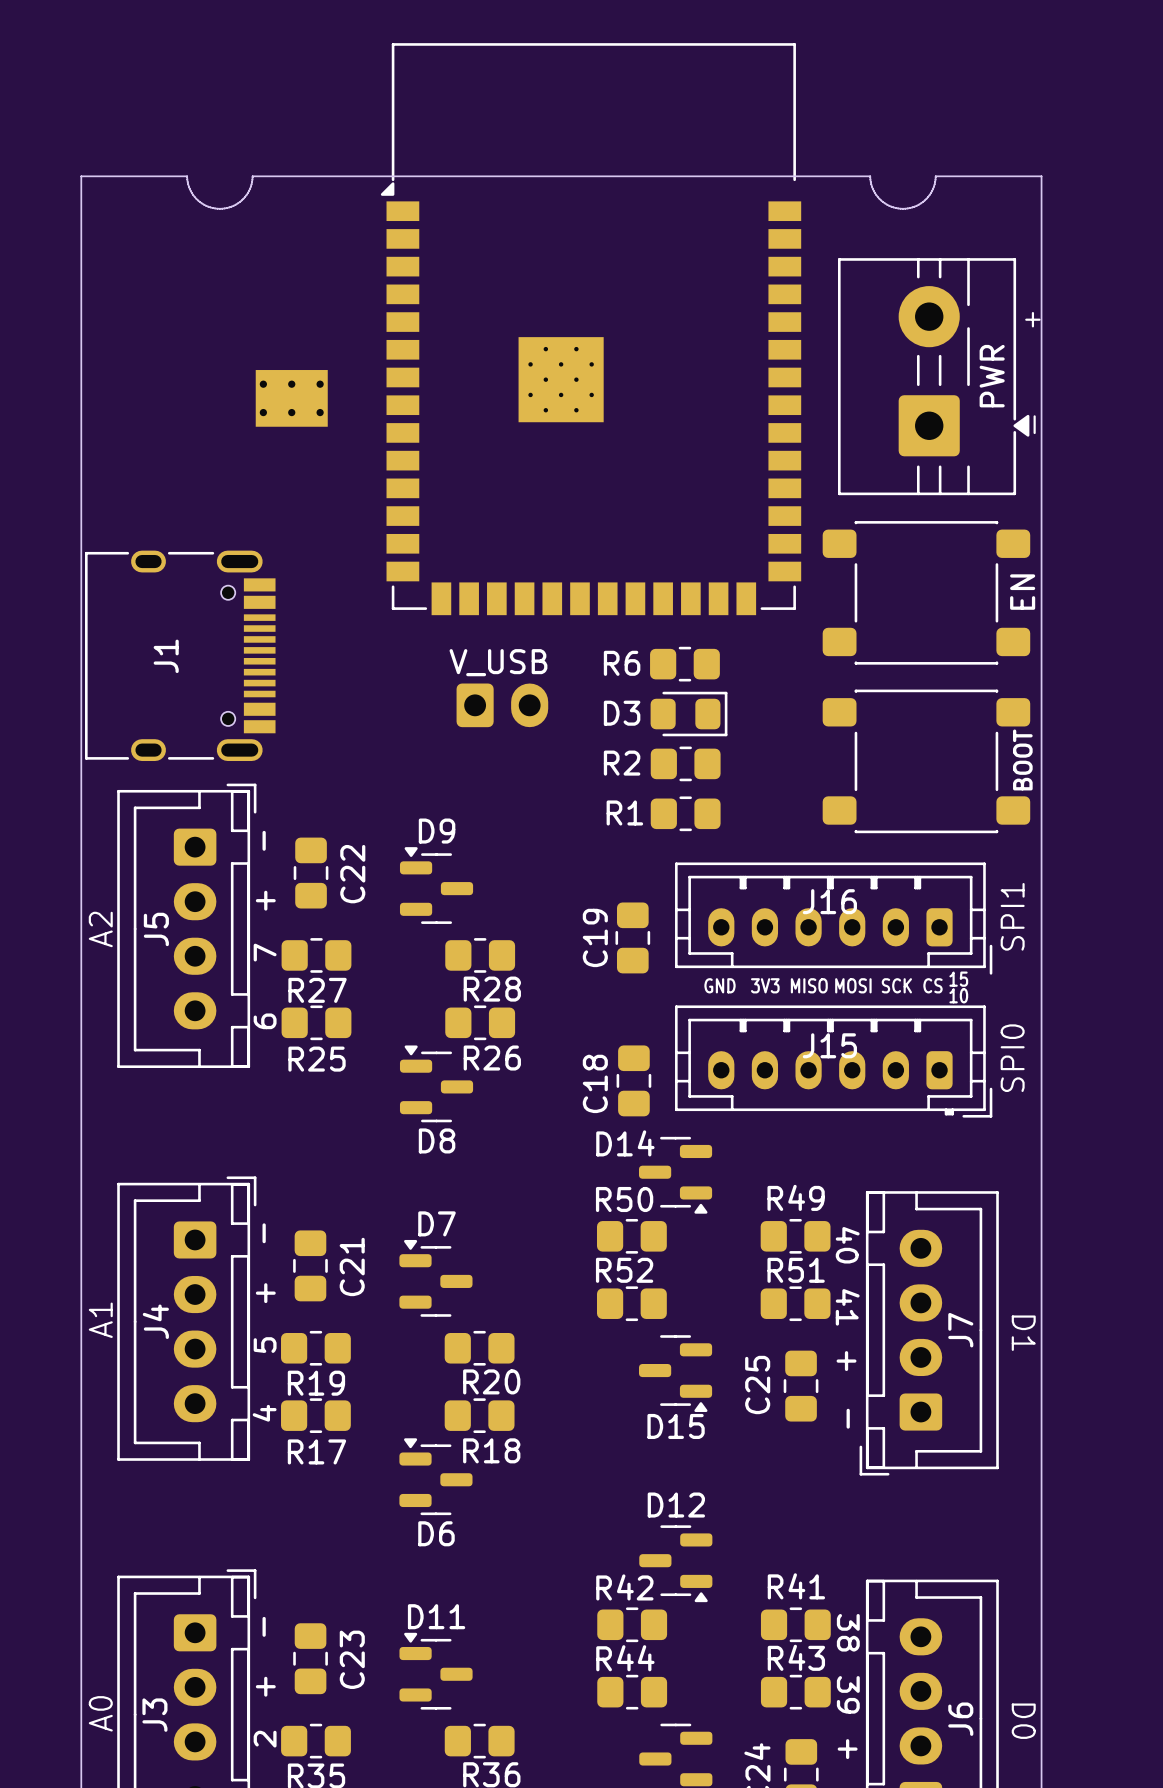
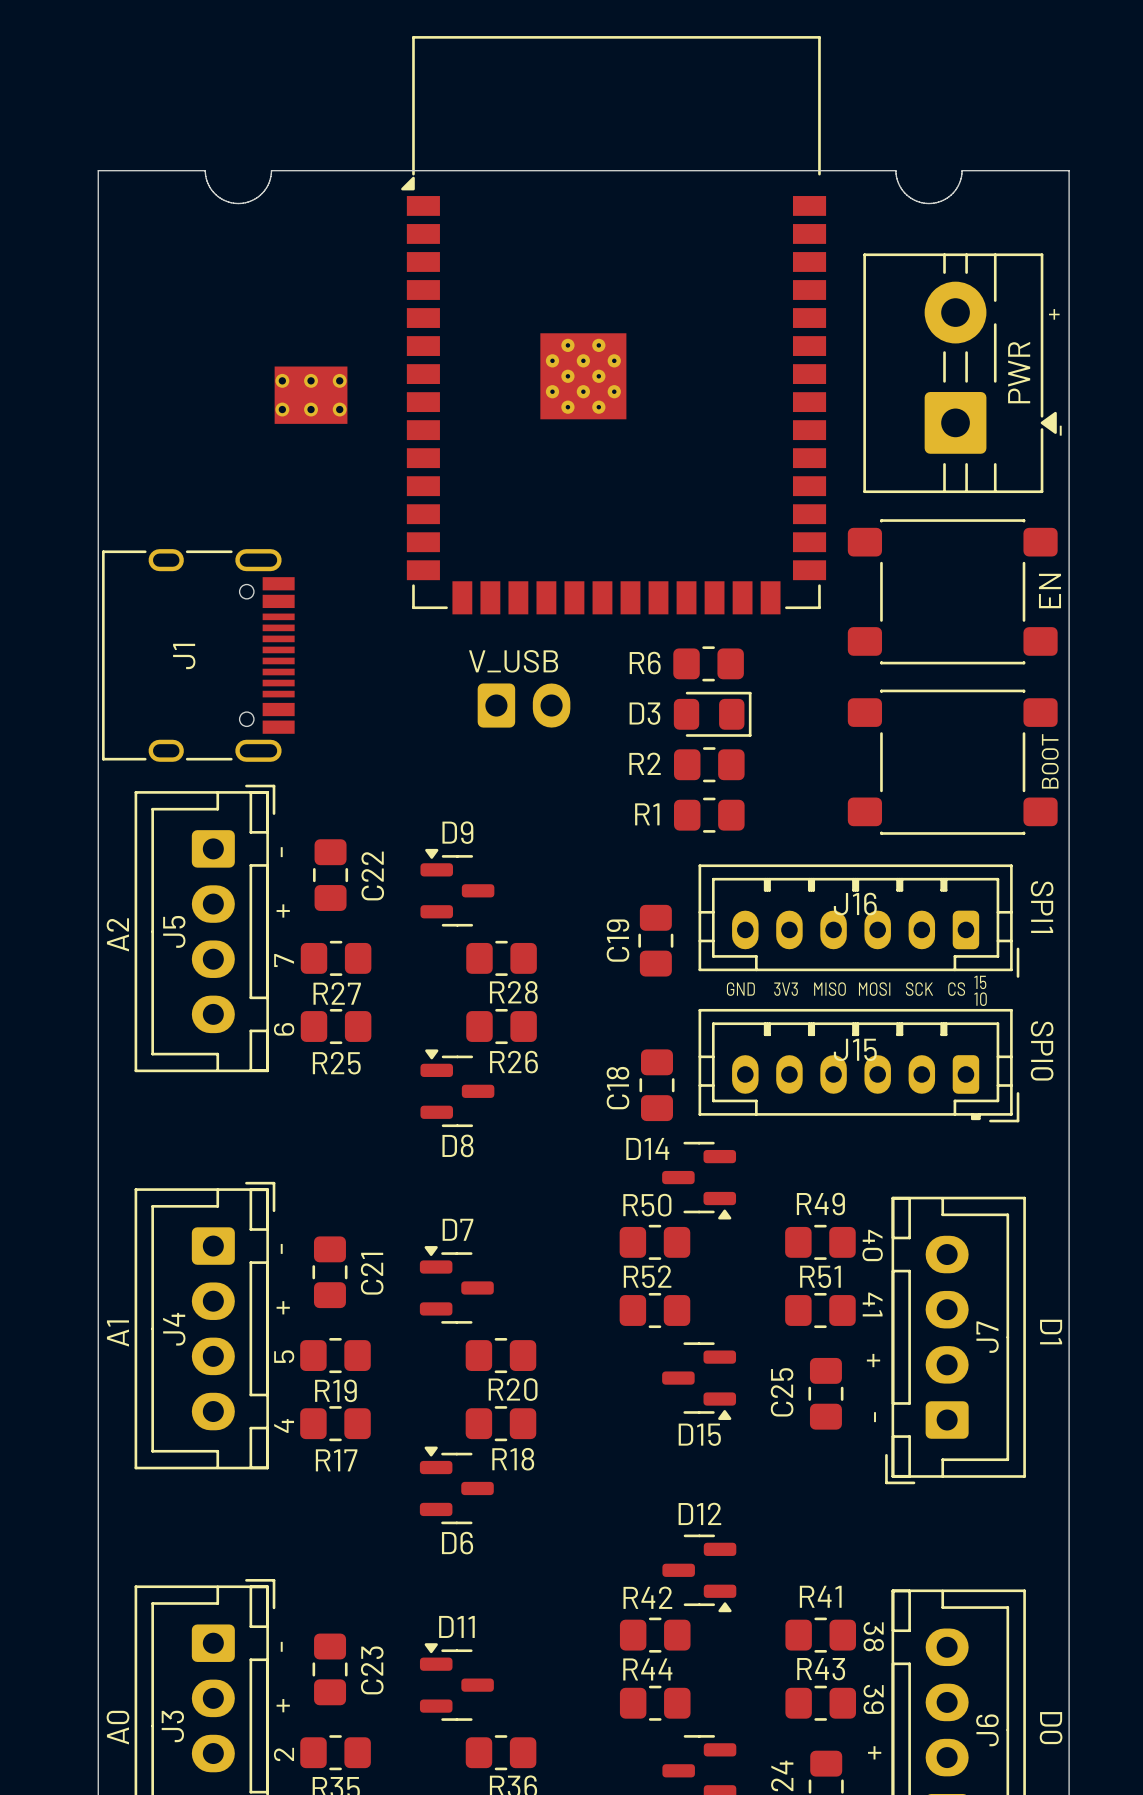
text rotation: 0° (1012, 916) -> 180° (1042, 907)
text rotation: 0° (1012, 1058) -> 180° (1042, 1050)

